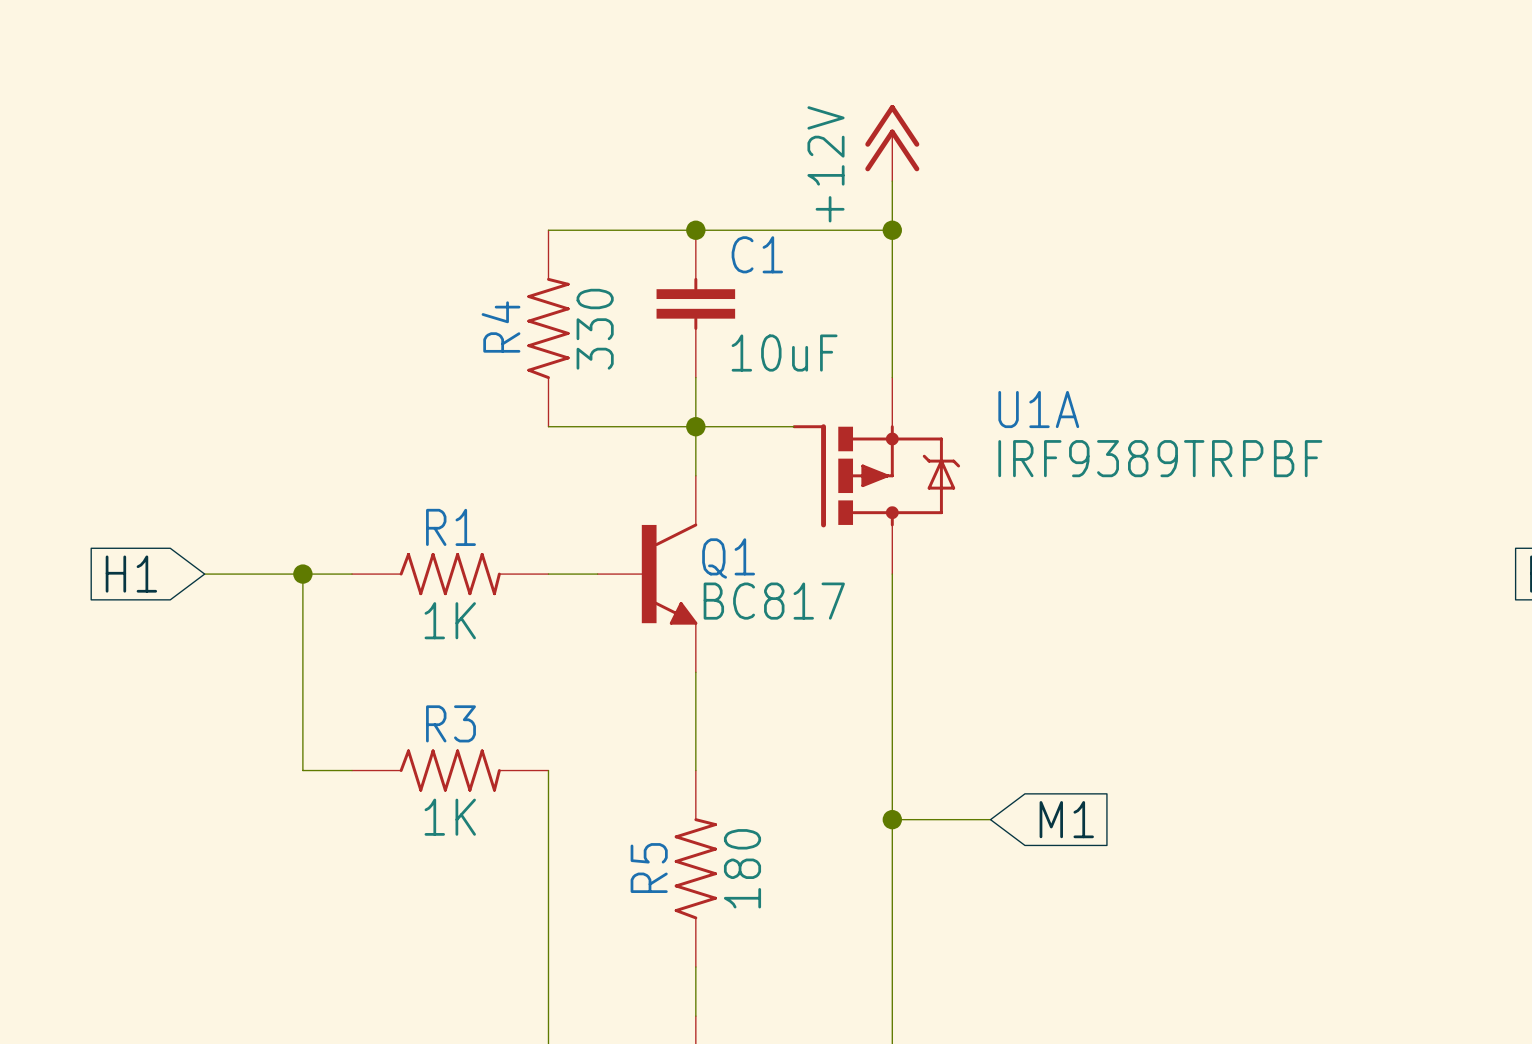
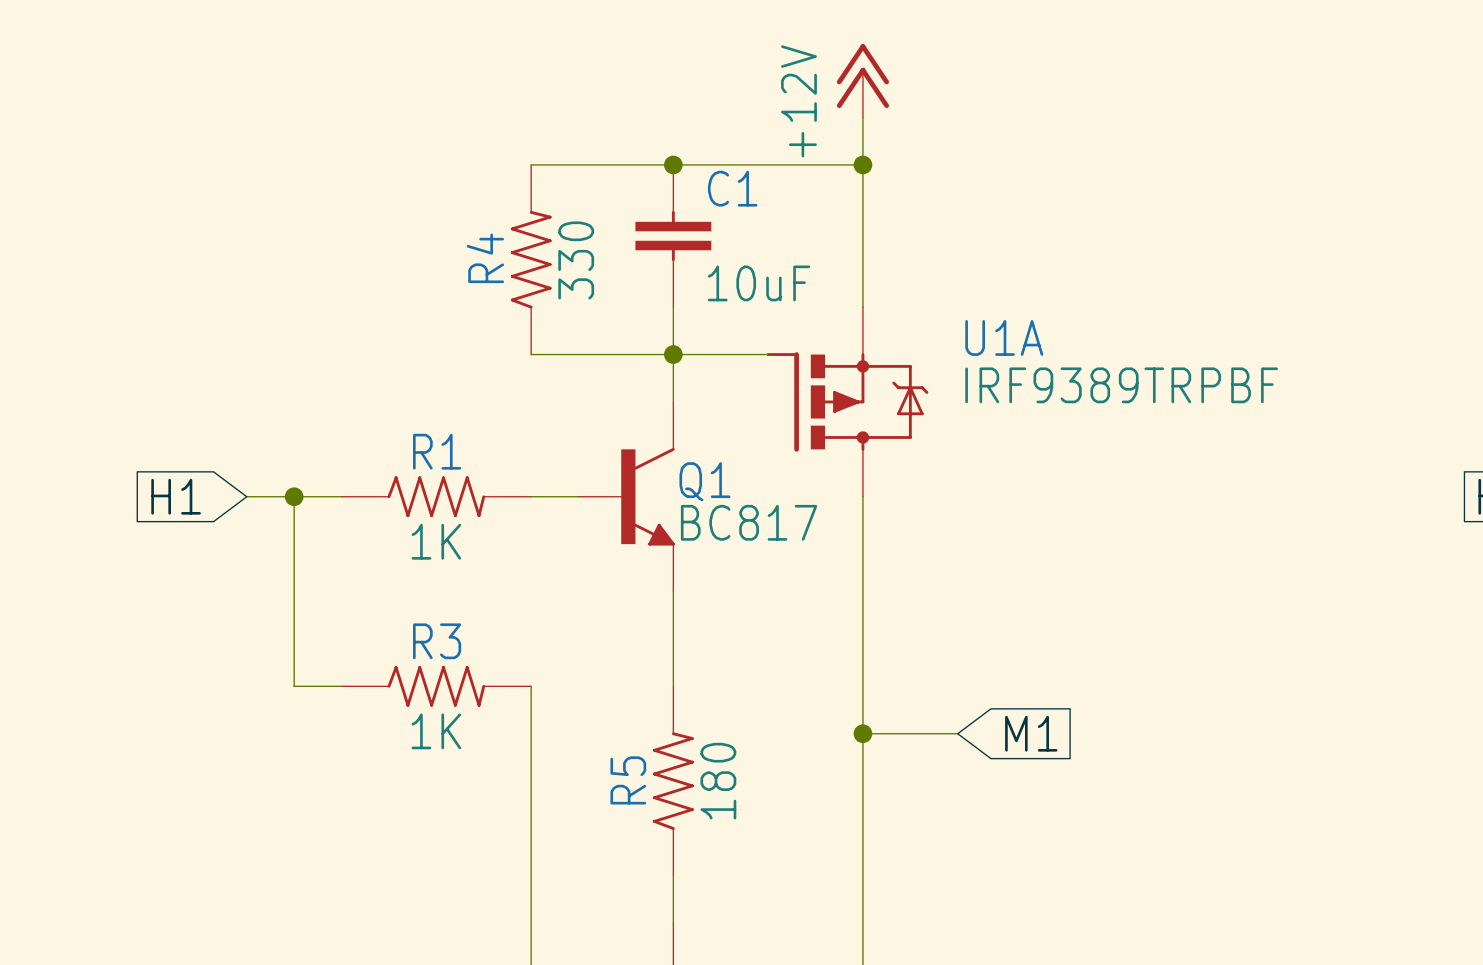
global label position: H1 (131, 574) -> H1 (176, 496)
wire: (204, 574) (253, 574) -> none

